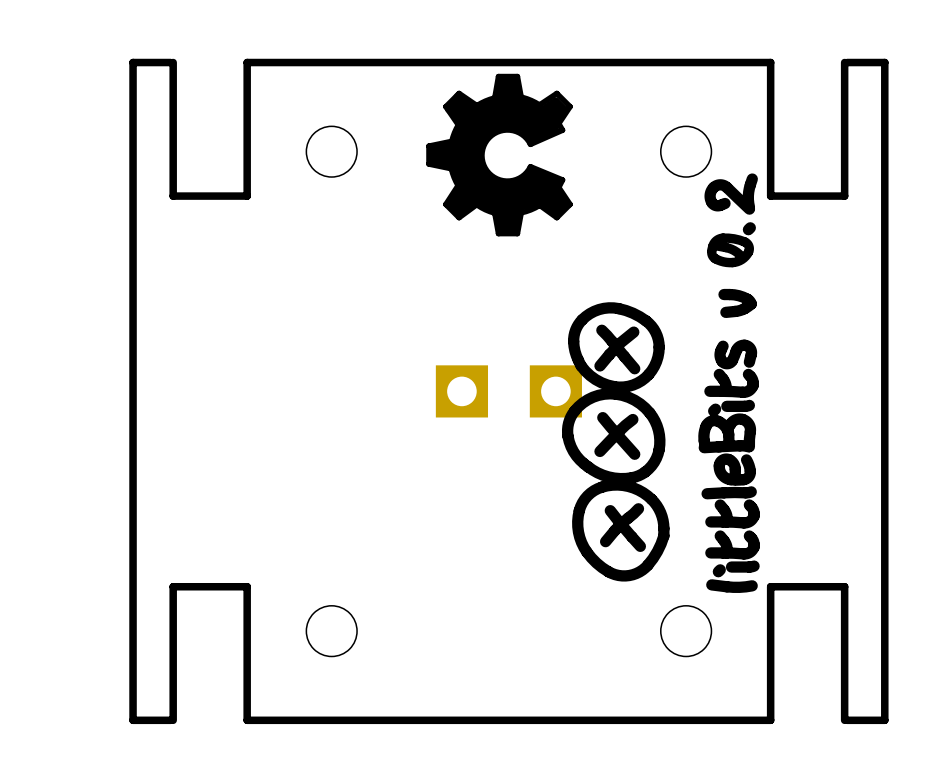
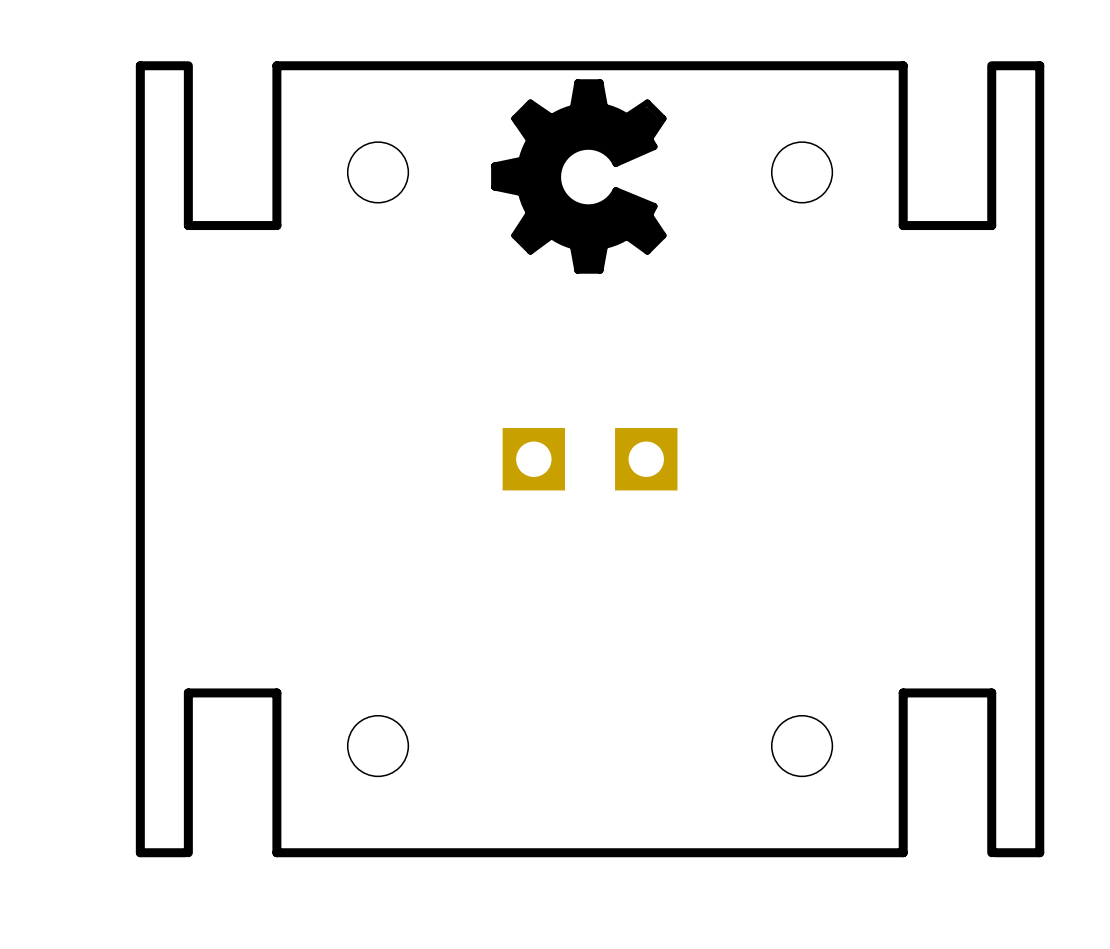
drawing: [561, 173, 760, 593] -> none

